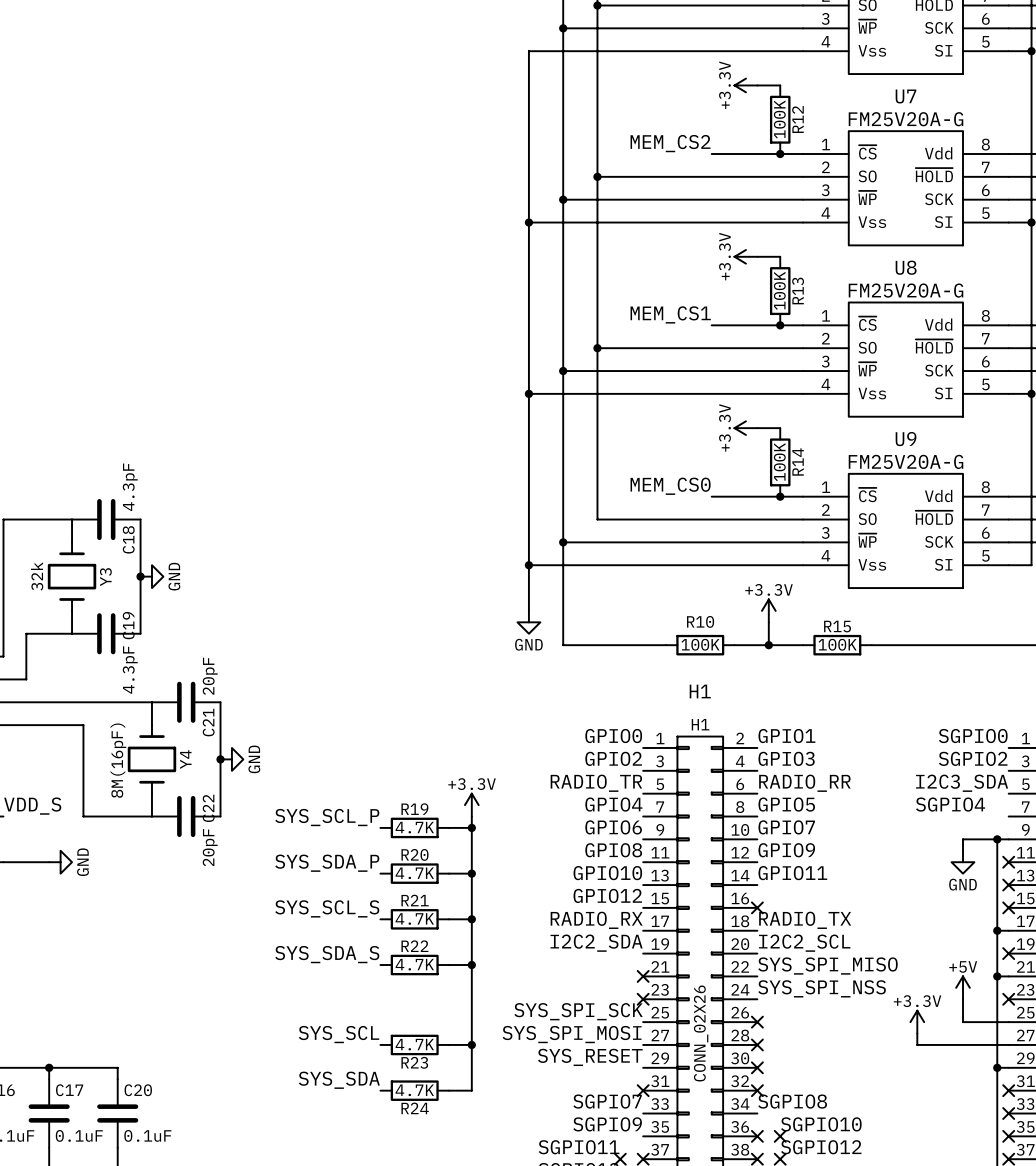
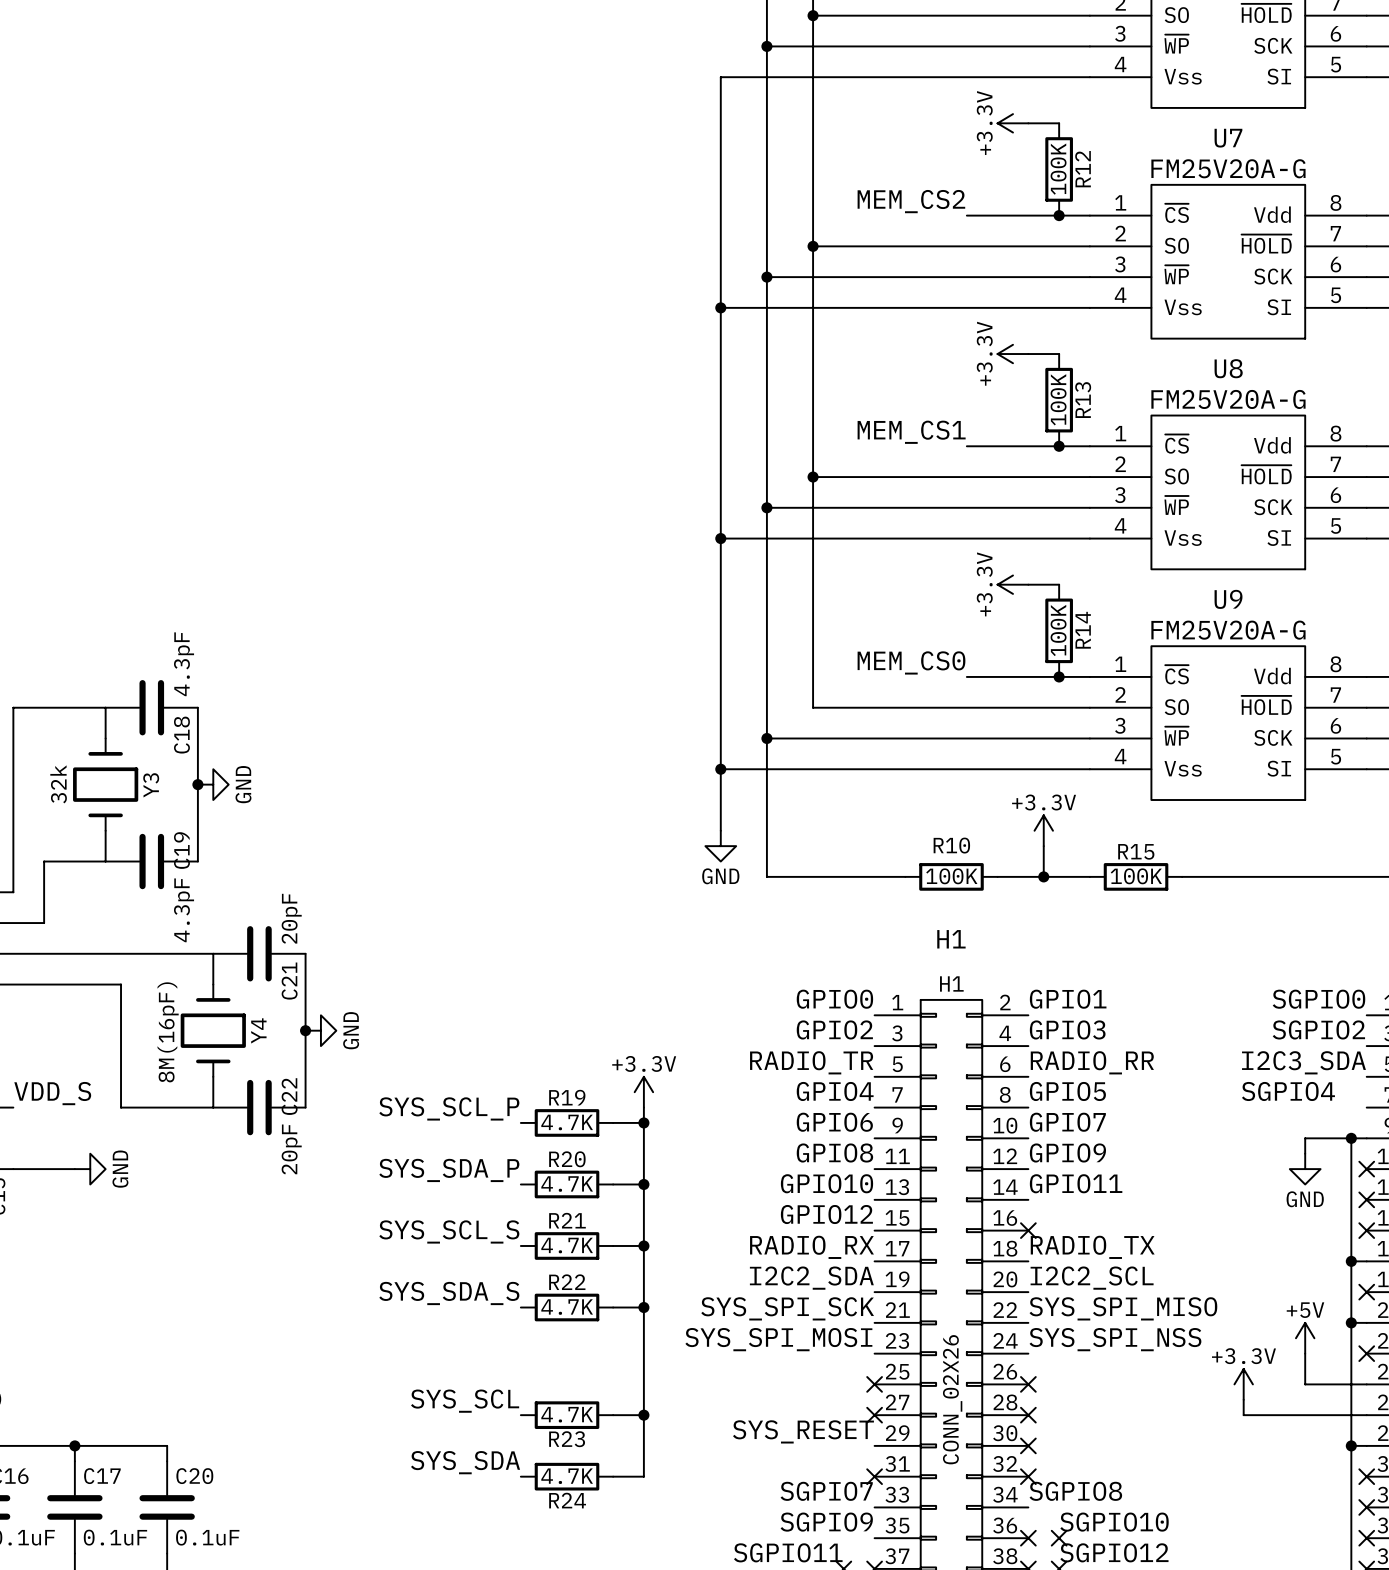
no-connect mark: (643, 976) -> none
no-connect mark: (643, 999) -> none
label position: SYS_SPI_SCK (578, 1011) -> SYS_SPI_SCK (787, 1308)
no-connect mark: none -> (874, 1384)
label position: SYS_SPI_MOSI (572, 1034) -> SYS_SPI_MOSI (778, 1339)
no-connect mark: none -> (874, 1415)

